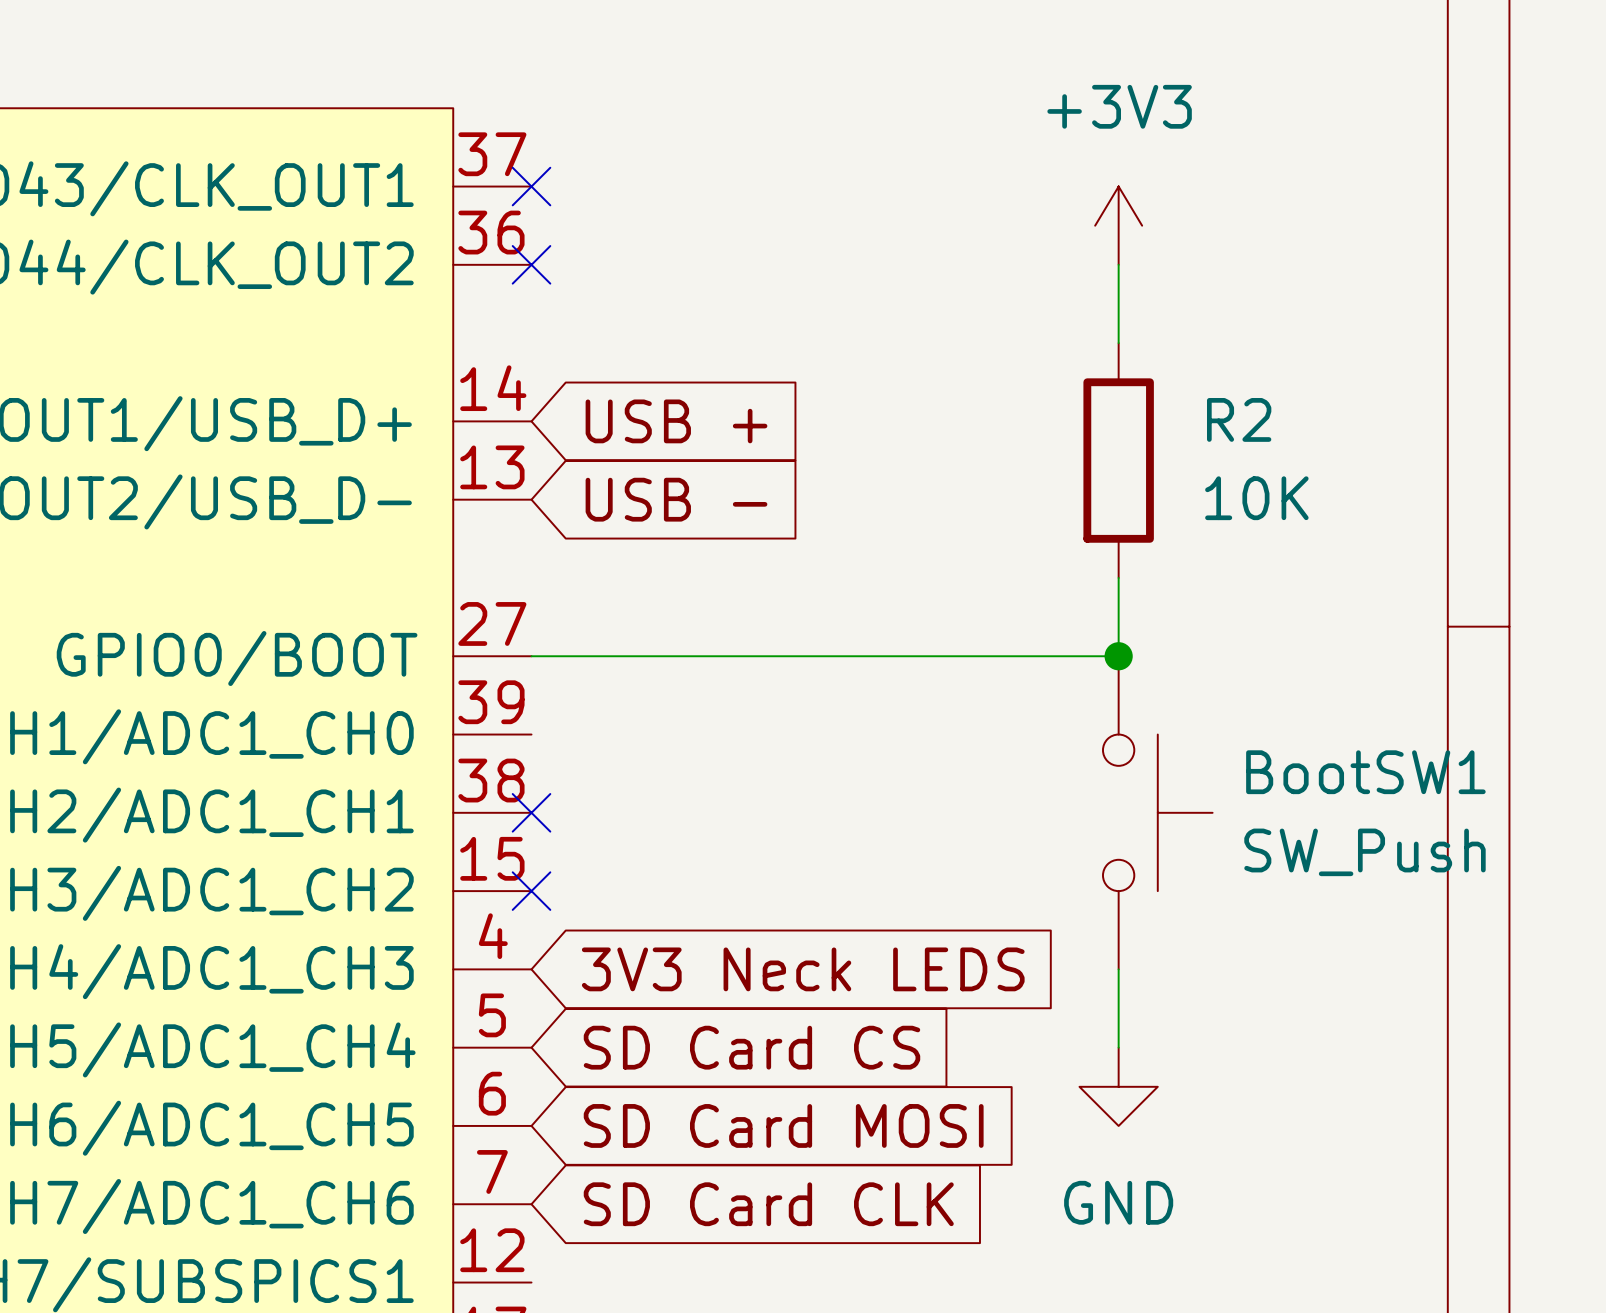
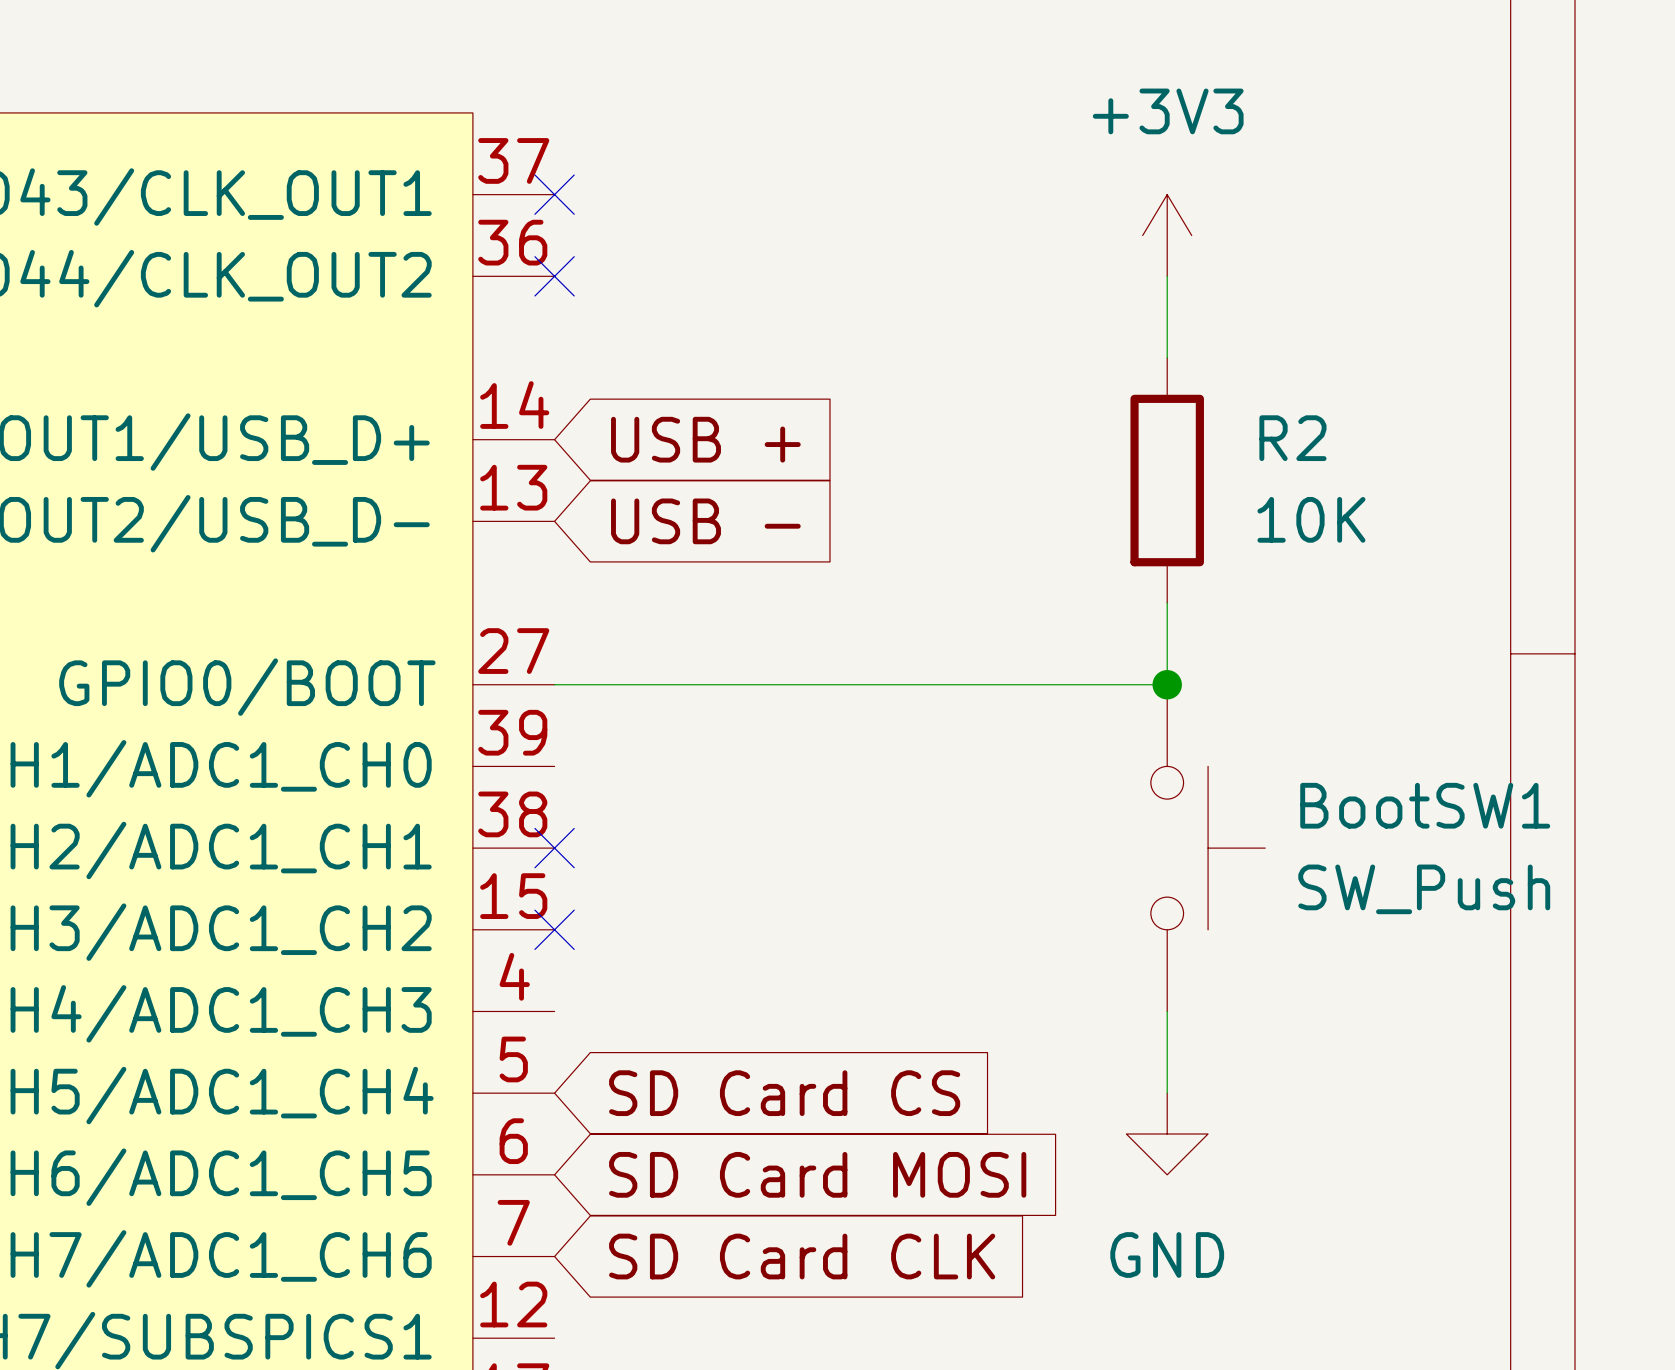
global label: 3V3 Neck LEDS (803, 969) -> none

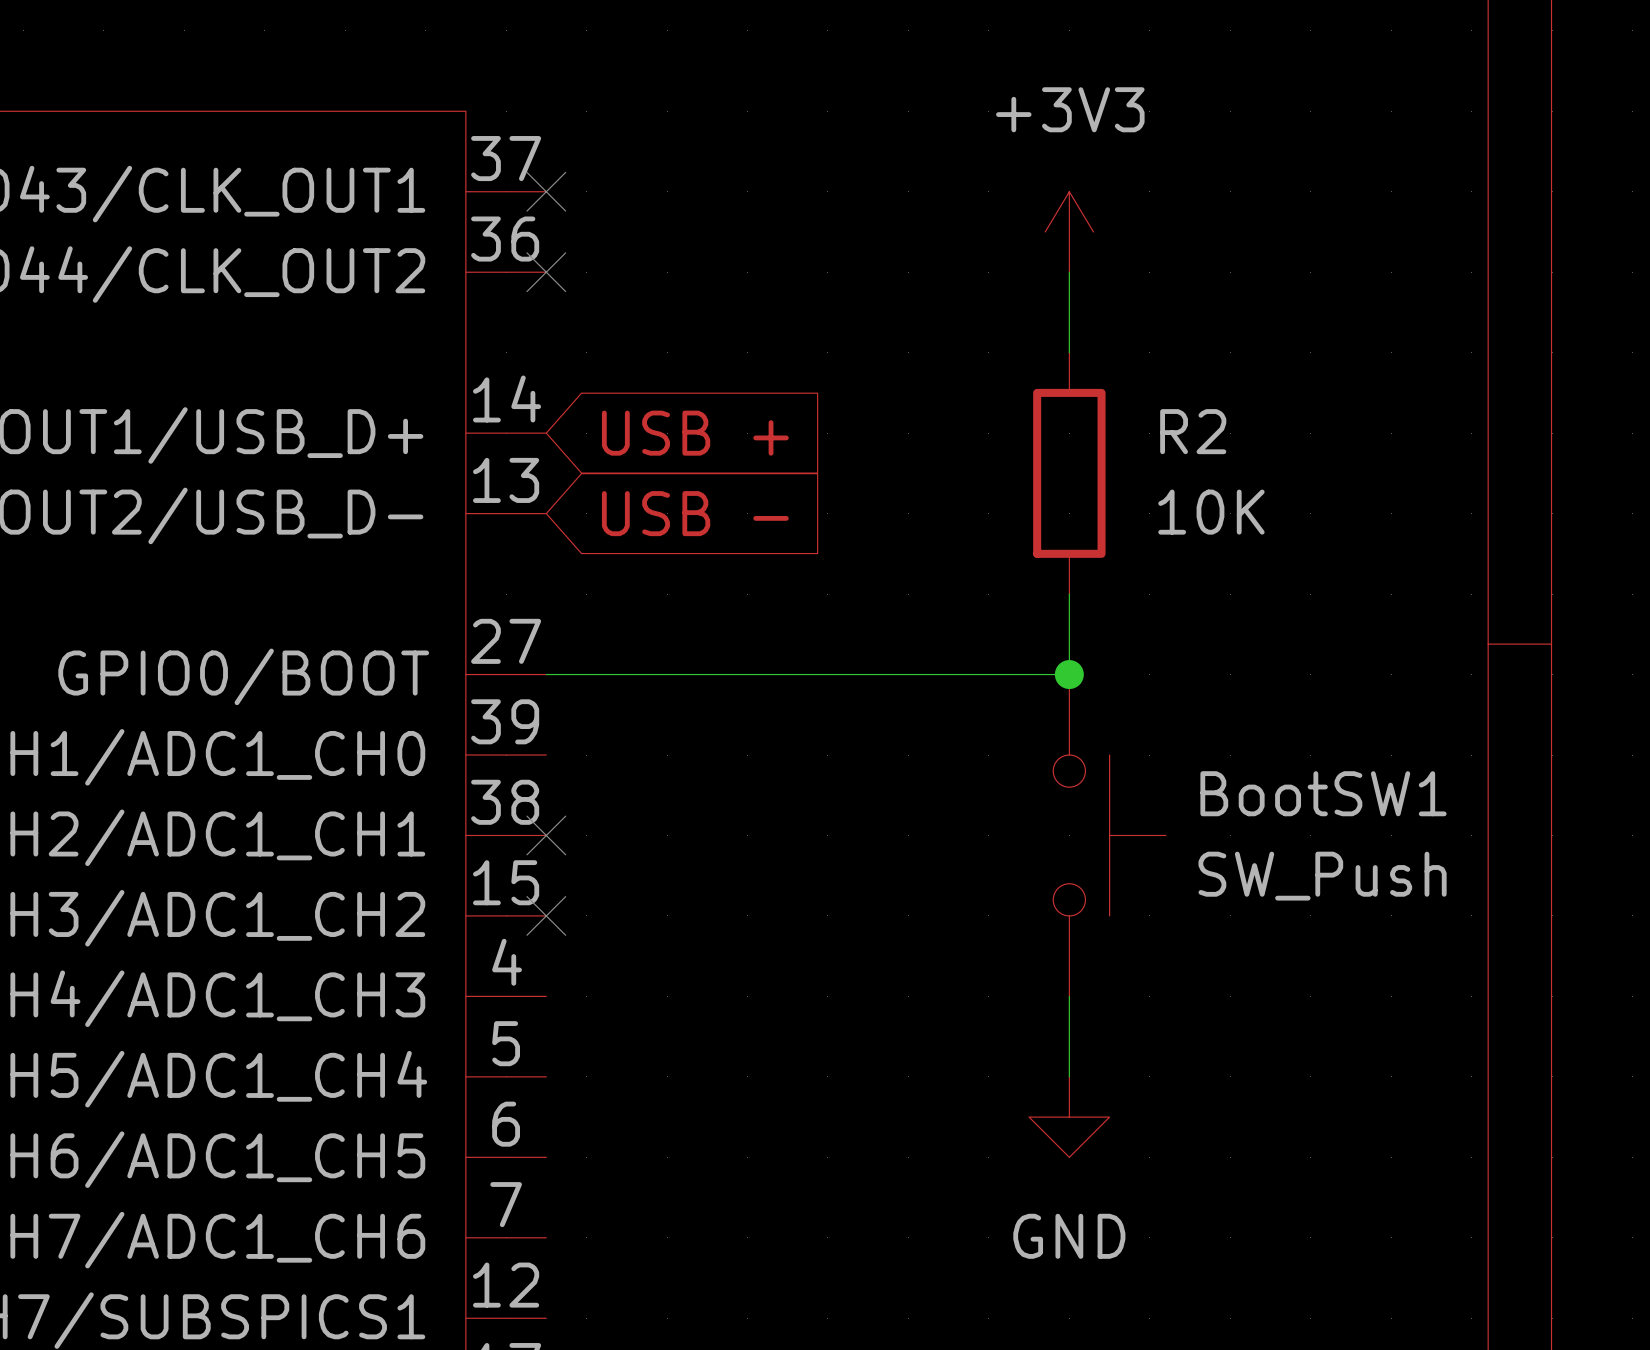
power symbol position: +3V3 (1167, 235) -> +3V3 (1069, 231)
wire: (1167, 276) (1167, 358) -> (1069, 272) (1069, 352)
R2 position: (1167, 480) -> (1069, 473)
wire: (1167, 603) (1167, 684) (1085, 684) -> (1069, 594) (1069, 674)
junction position: (1167, 684) -> (1069, 674)
BootSW1 position: (1208, 848) -> (1109, 835)
wire: (1167, 1011) (1167, 1093) -> (1069, 996) (1069, 1076)
global label: SD Card CS (784, 1093) -> none
power symbol position: GND (1167, 1134) -> GND (1069, 1117)
global label: SD Card MOSI (817, 1174) -> none
global label: SD Card CLK (802, 1256) -> none

